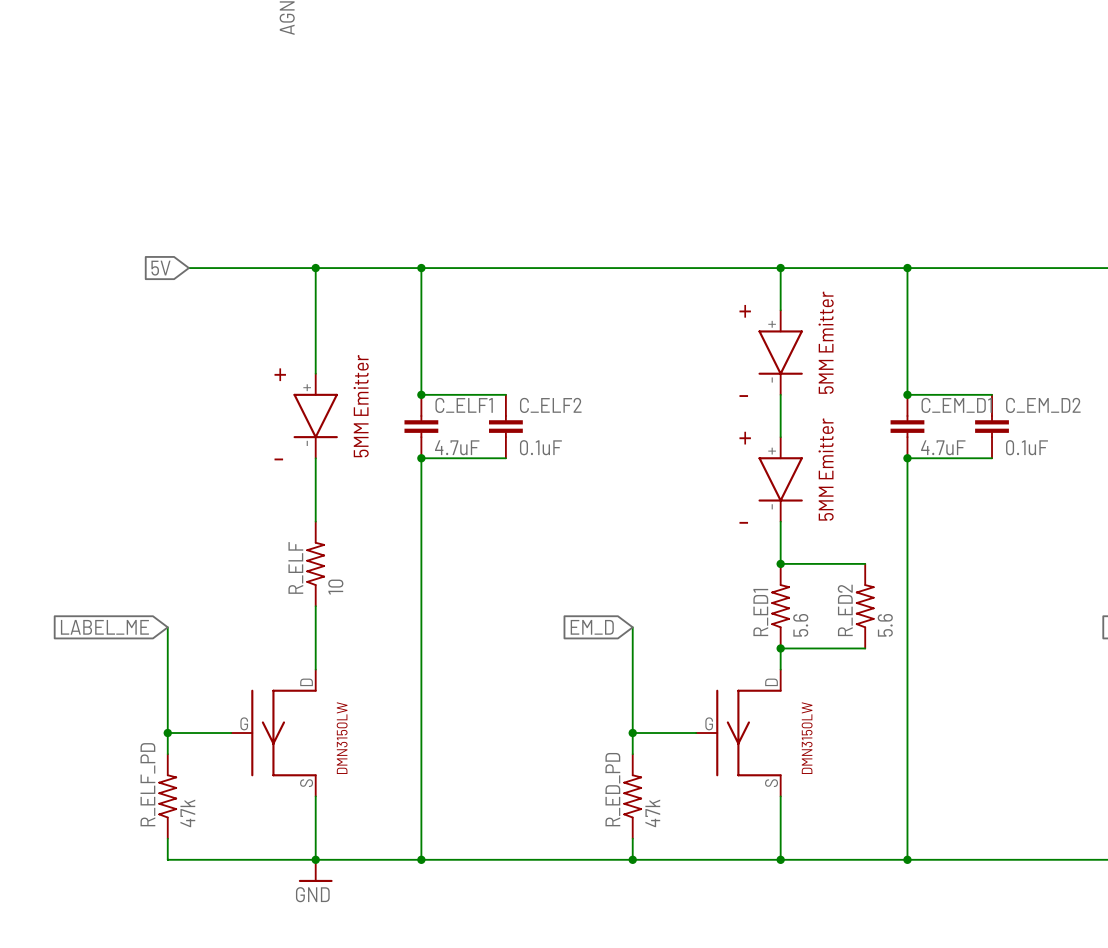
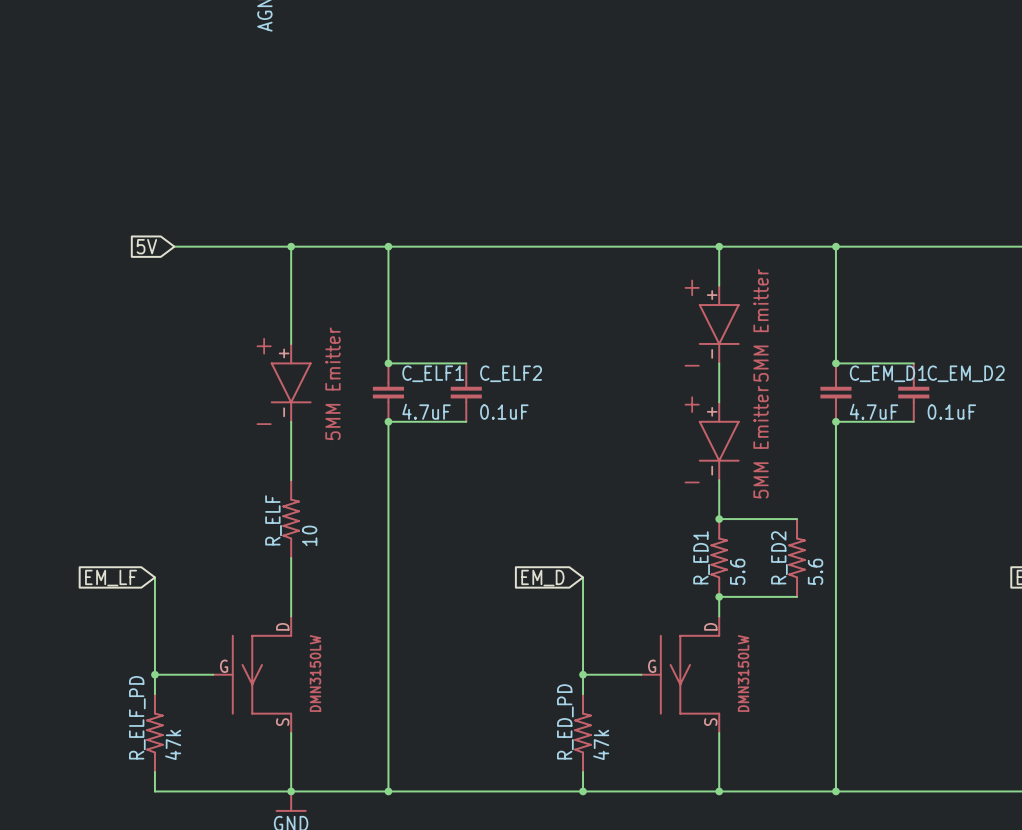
global label: LABEL_ME (104, 627) -> EM_LF (111, 578)

